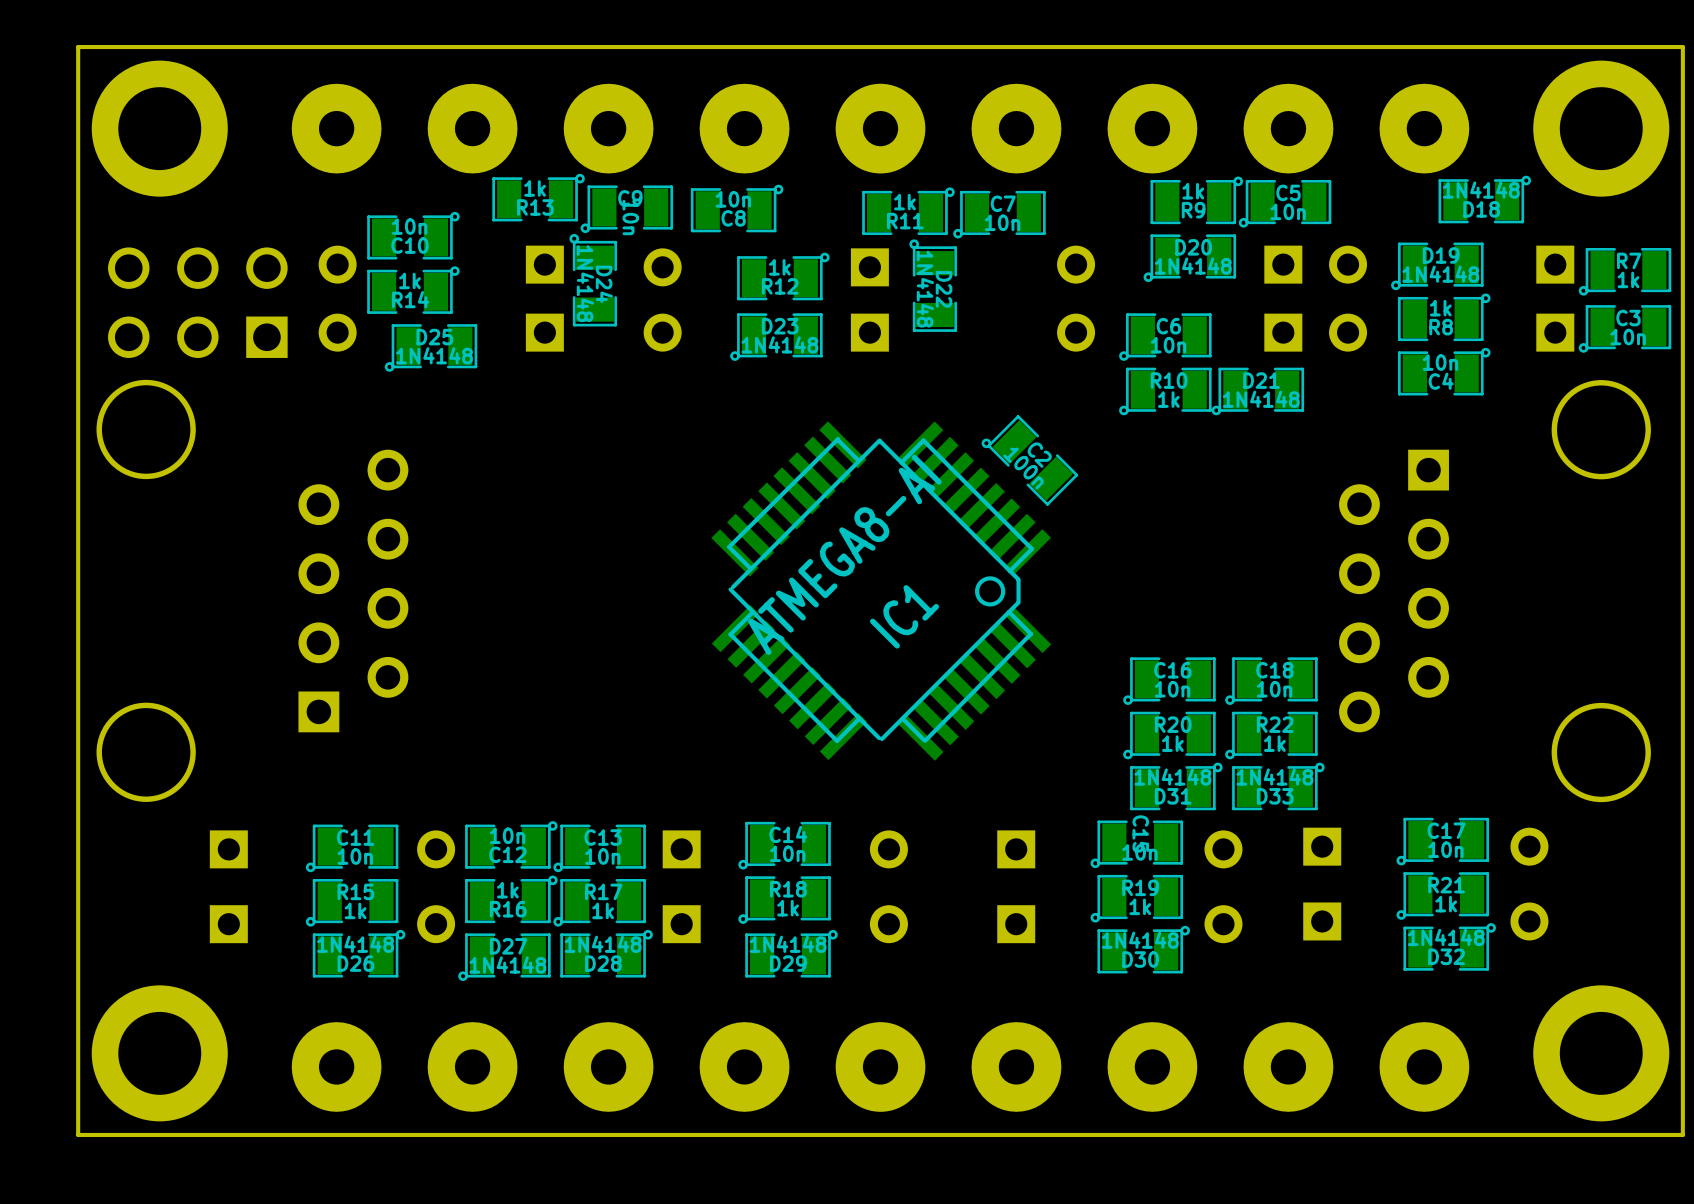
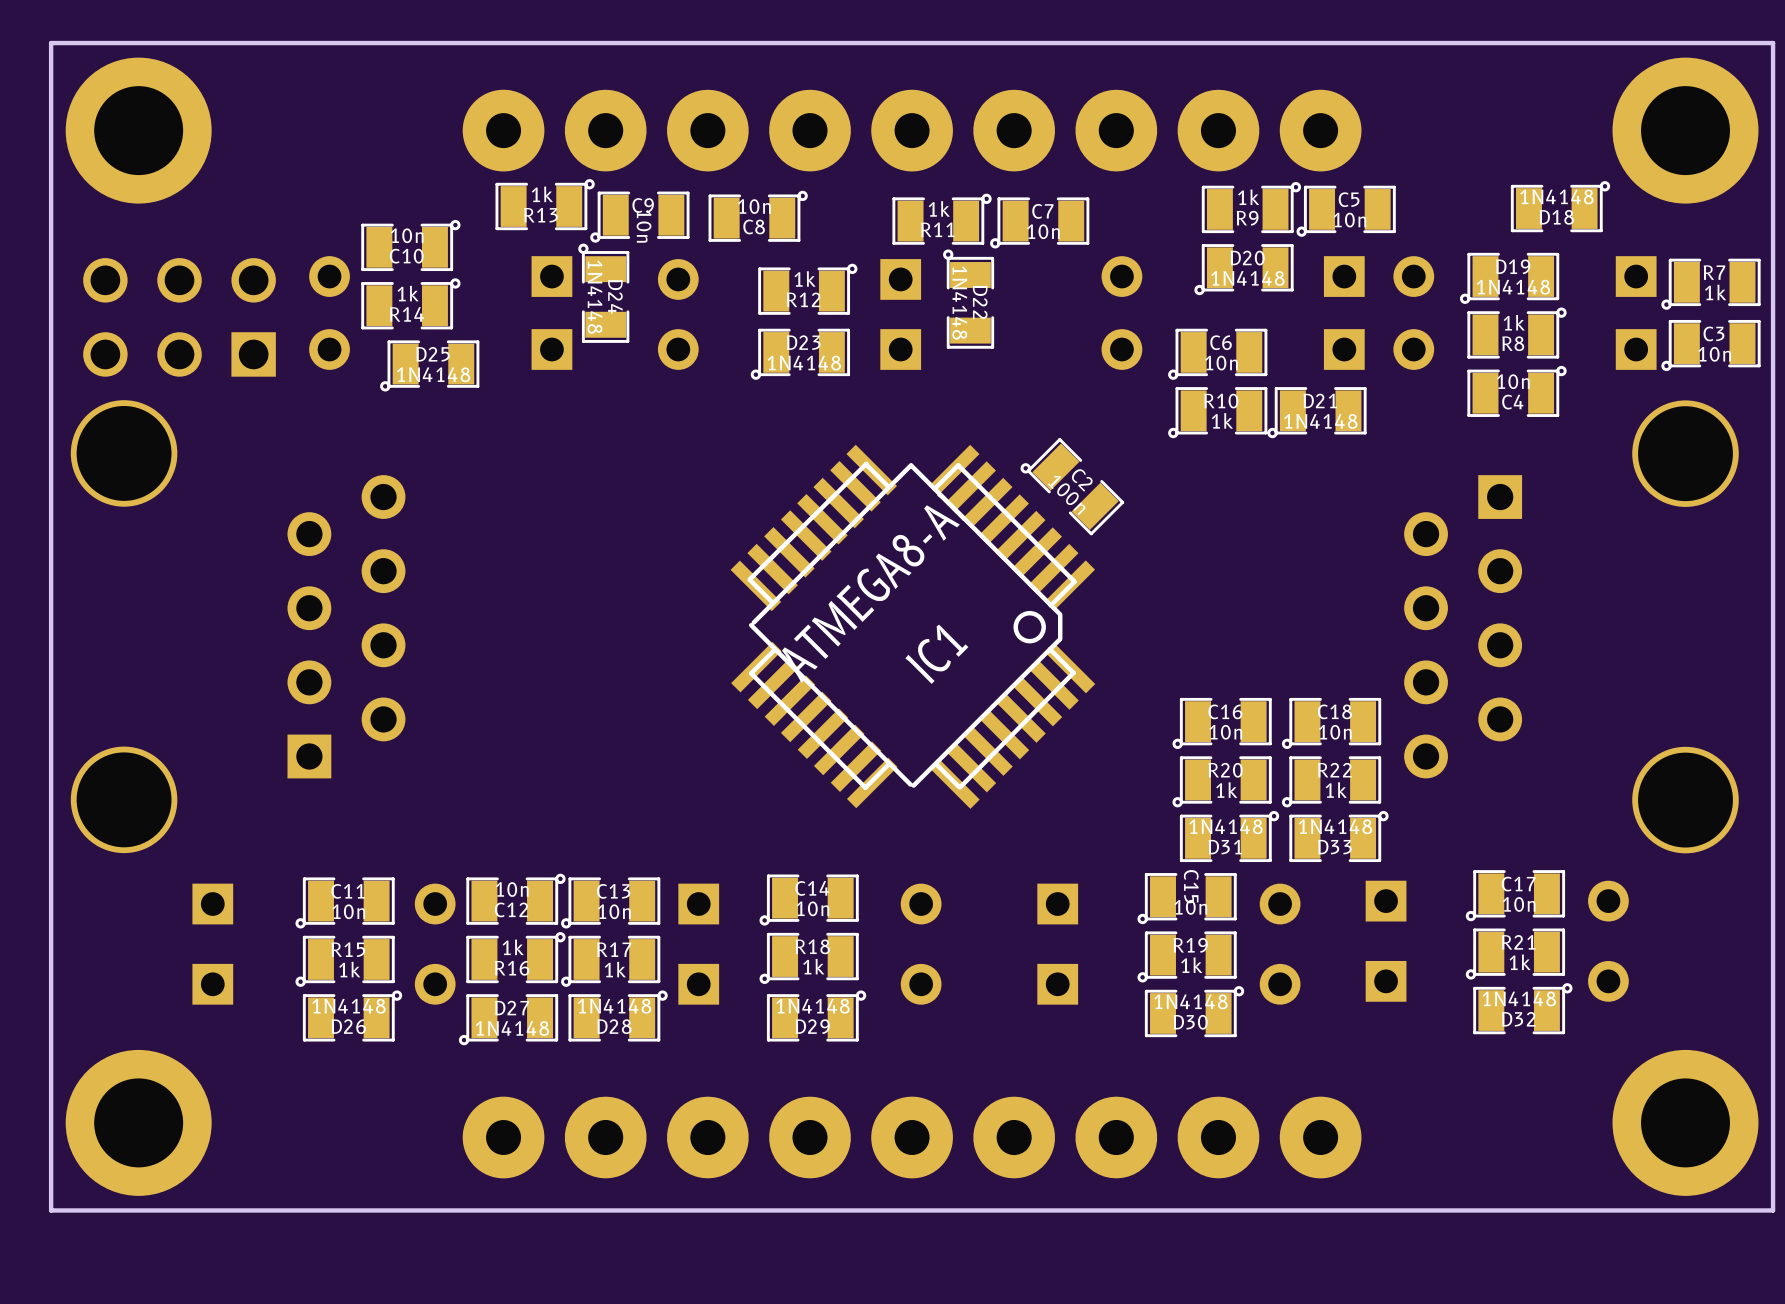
part footprint: [291, 83, 1470, 174] -> [462, 89, 1362, 172]
part footprint: [291, 1022, 1470, 1112] -> [462, 1096, 1362, 1179]

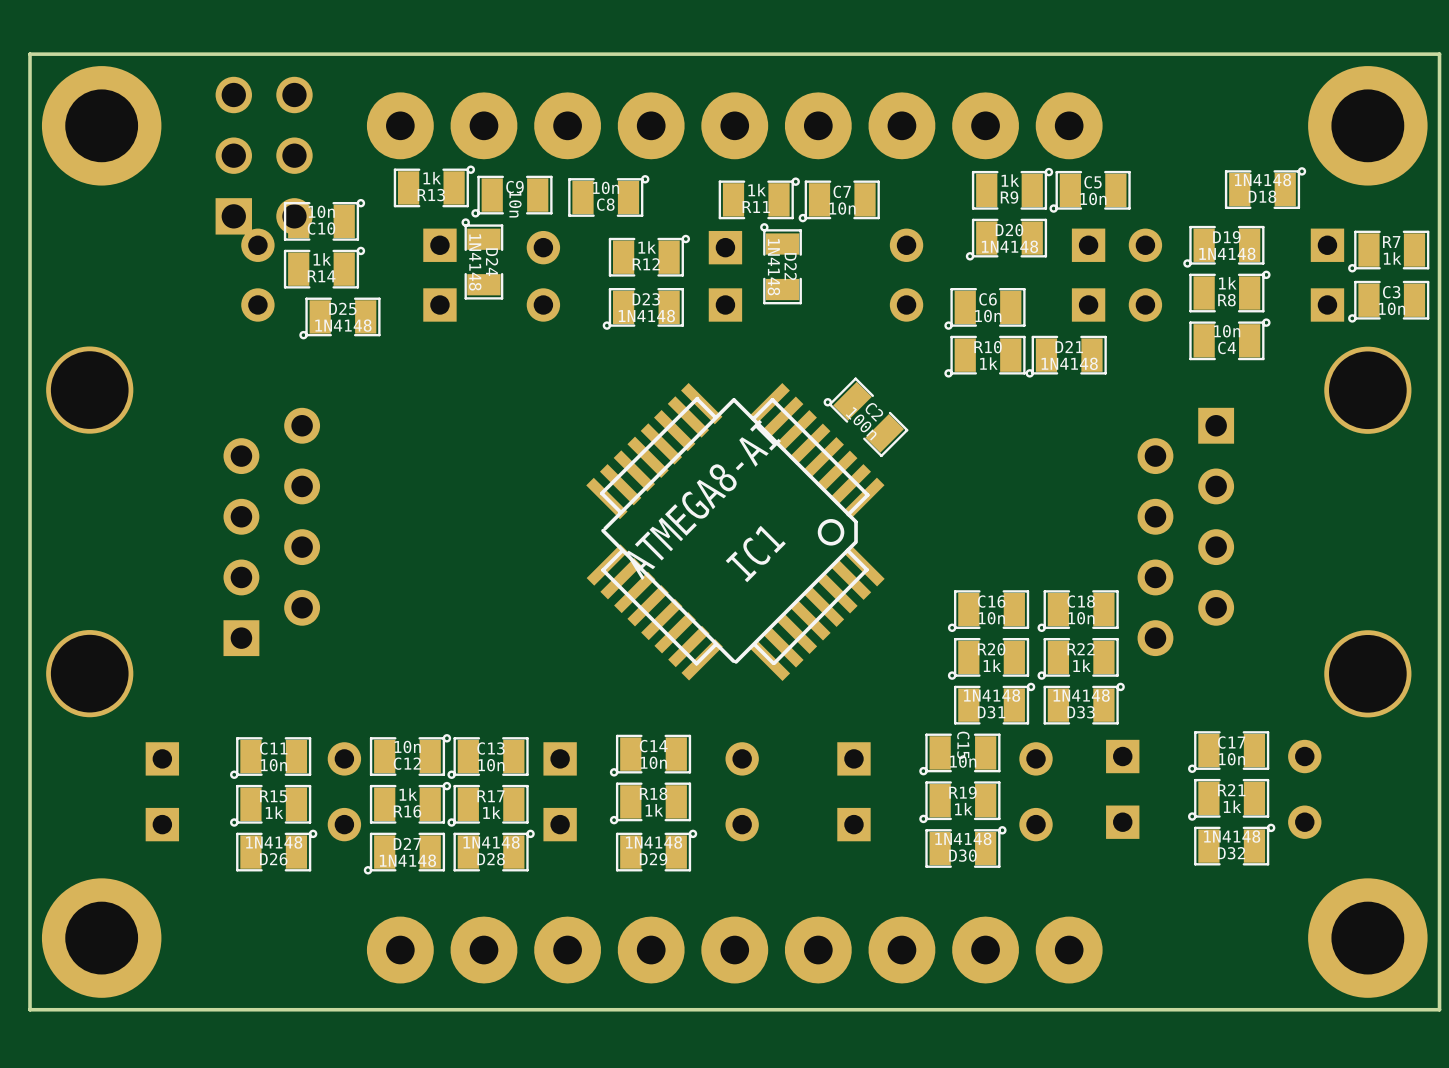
part rotation: 0° (179, 317) -> 90° clockwise (264, 155)
part position: (179, 317) -> (264, 155)

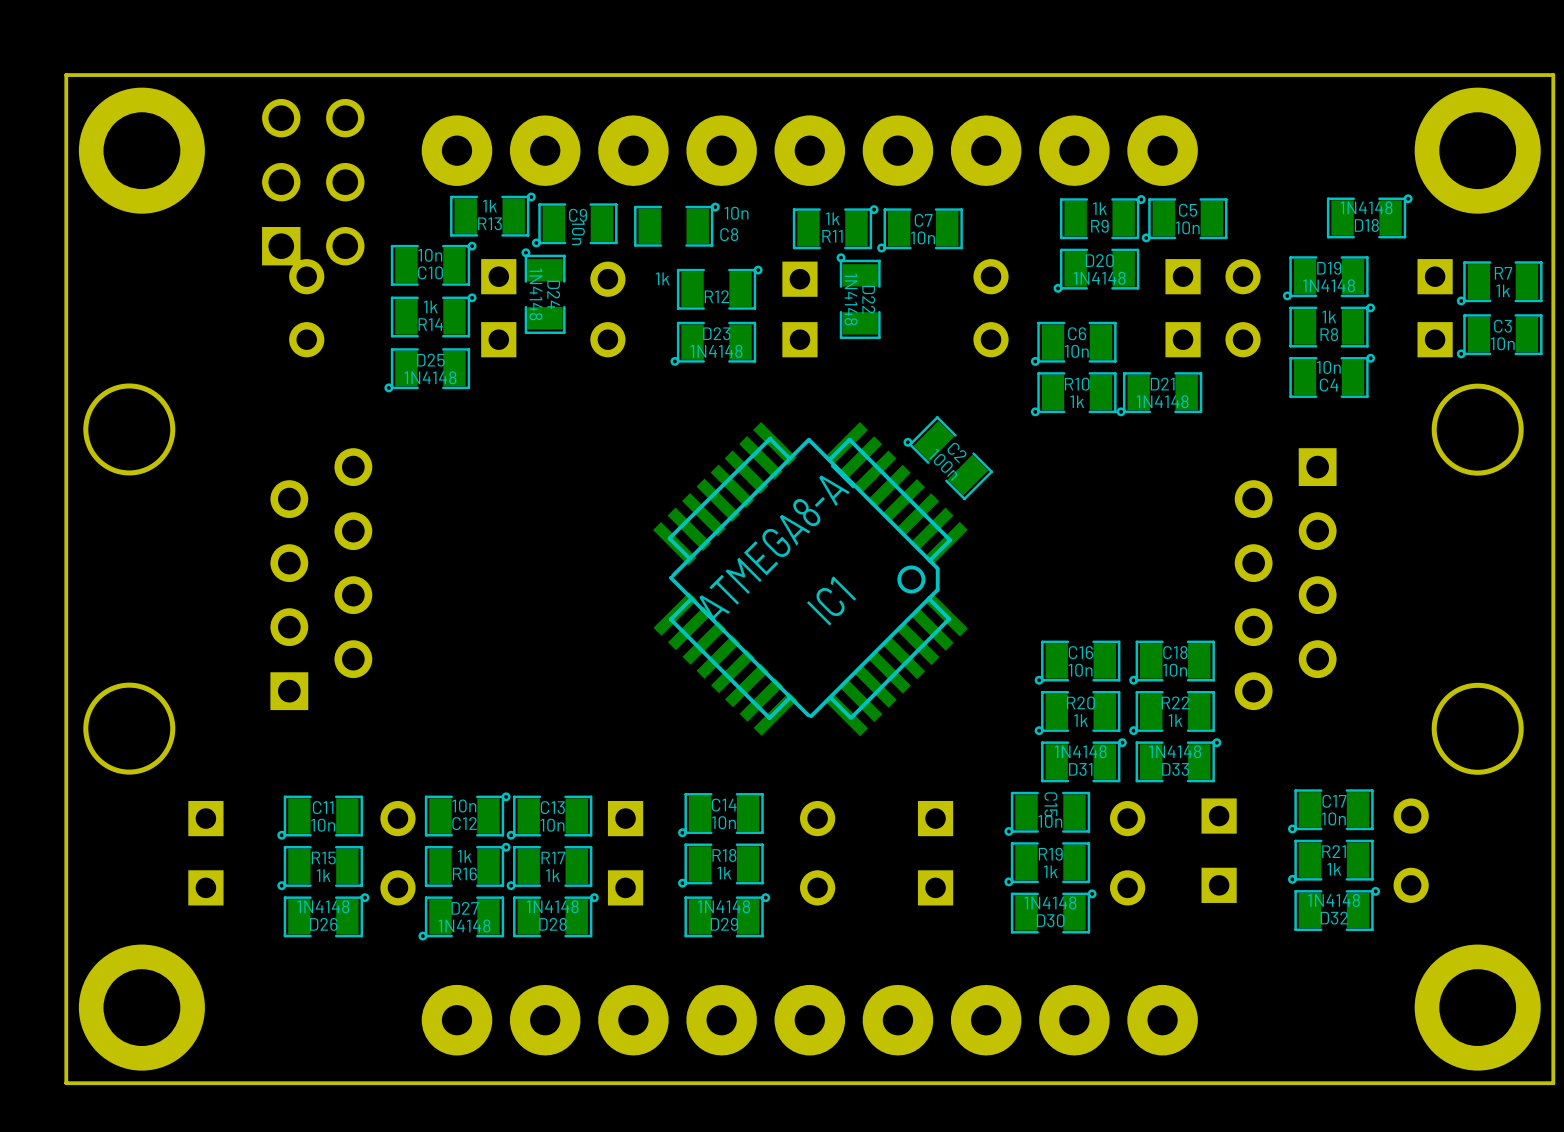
C8 value position: 10n (606, 187) -> 10n (736, 213)
C8 name position: C8 (605, 204) -> C8 (729, 234)
C10 position: (324, 219) -> (433, 263)
R12 value position: 1k (647, 247) -> 1k (662, 278)
R14 position: (324, 267) -> (433, 315)
D25 position: (339, 318) -> (427, 370)

